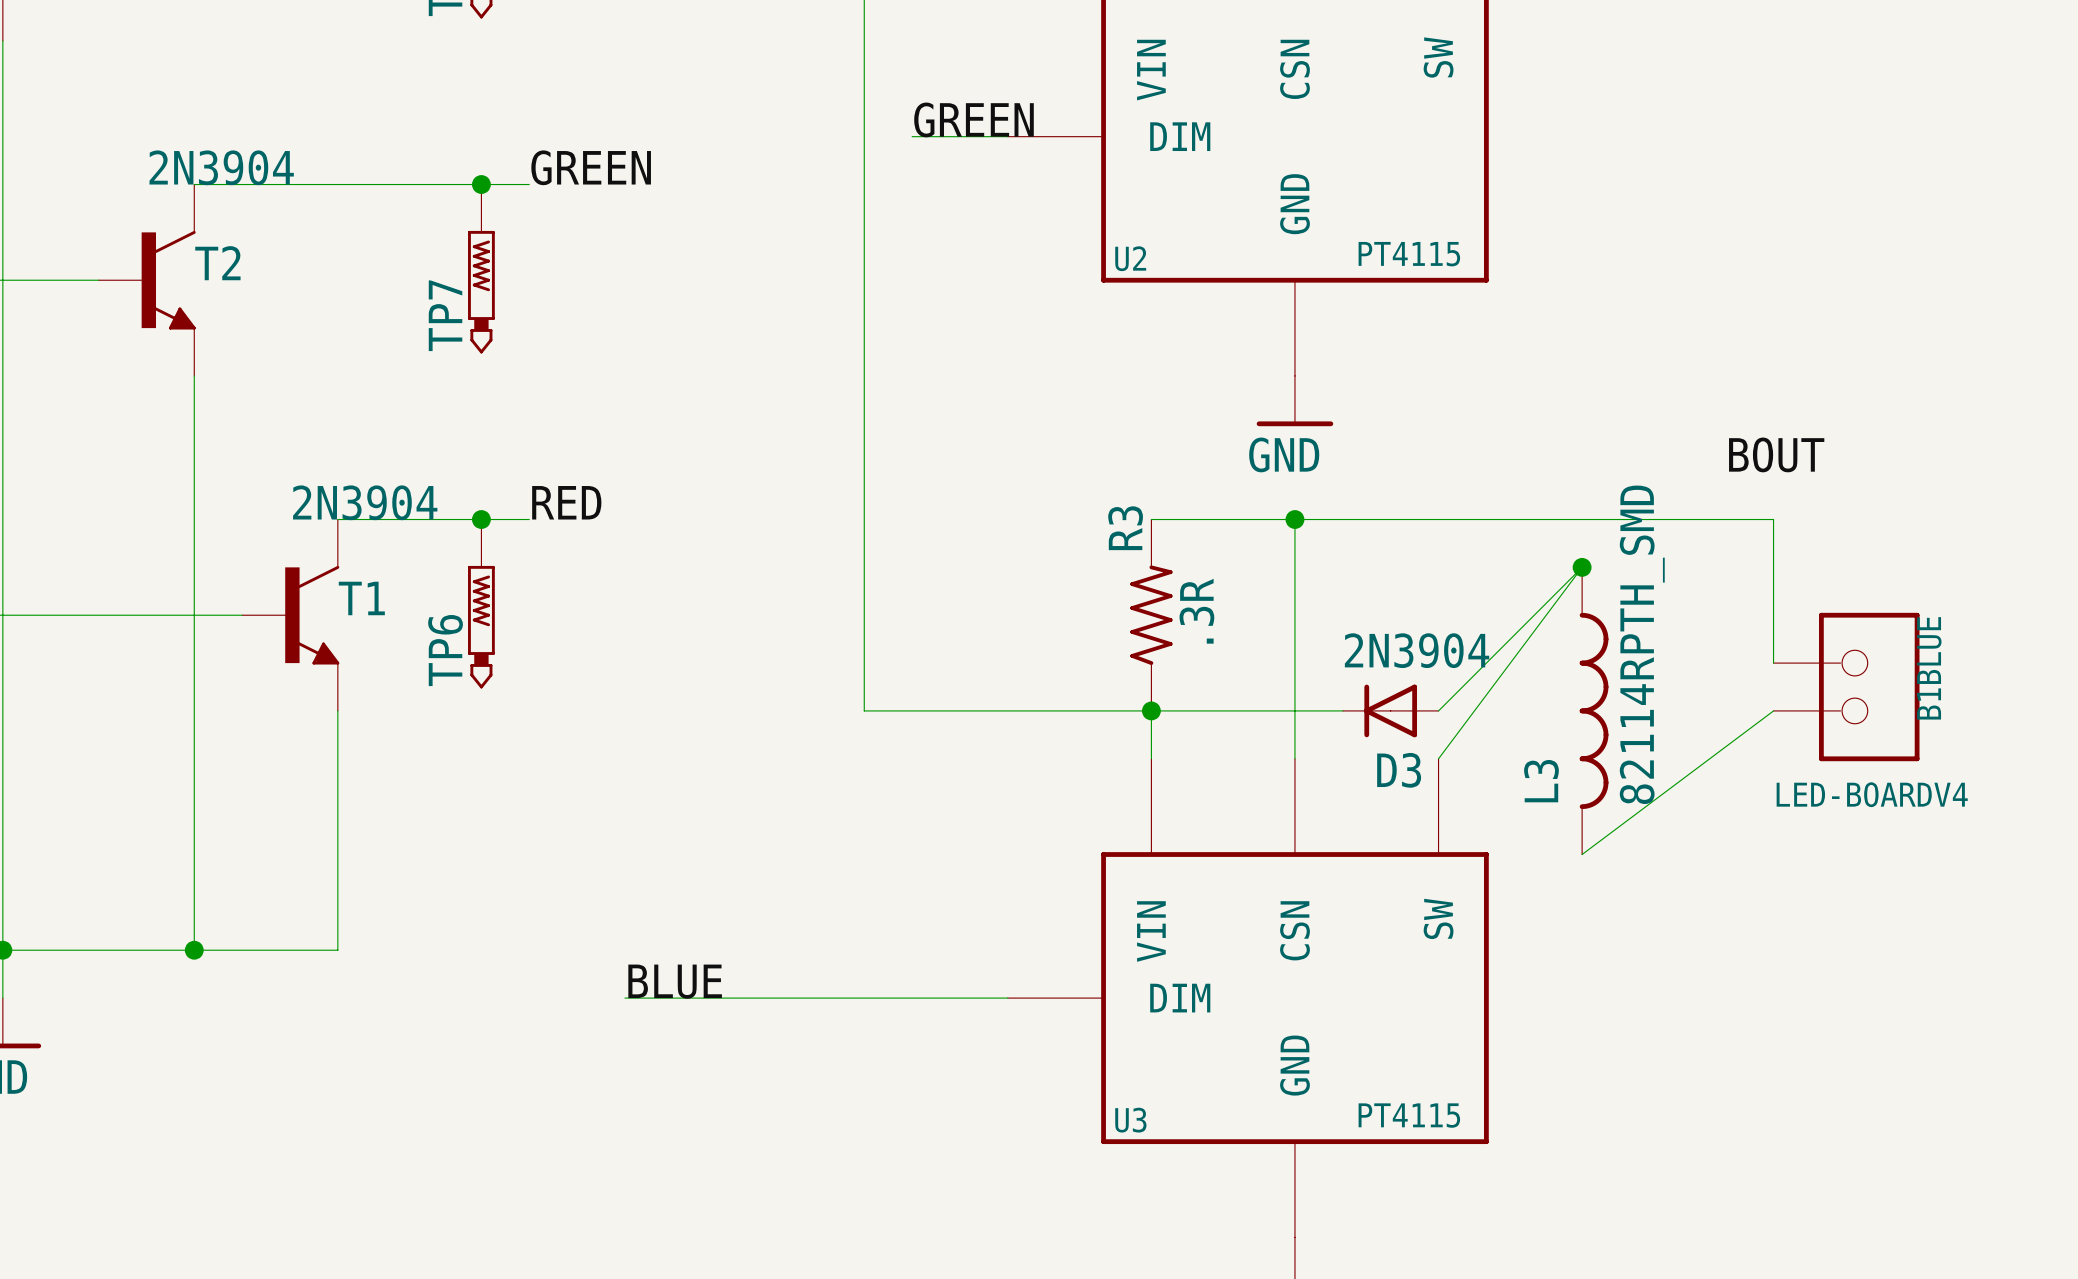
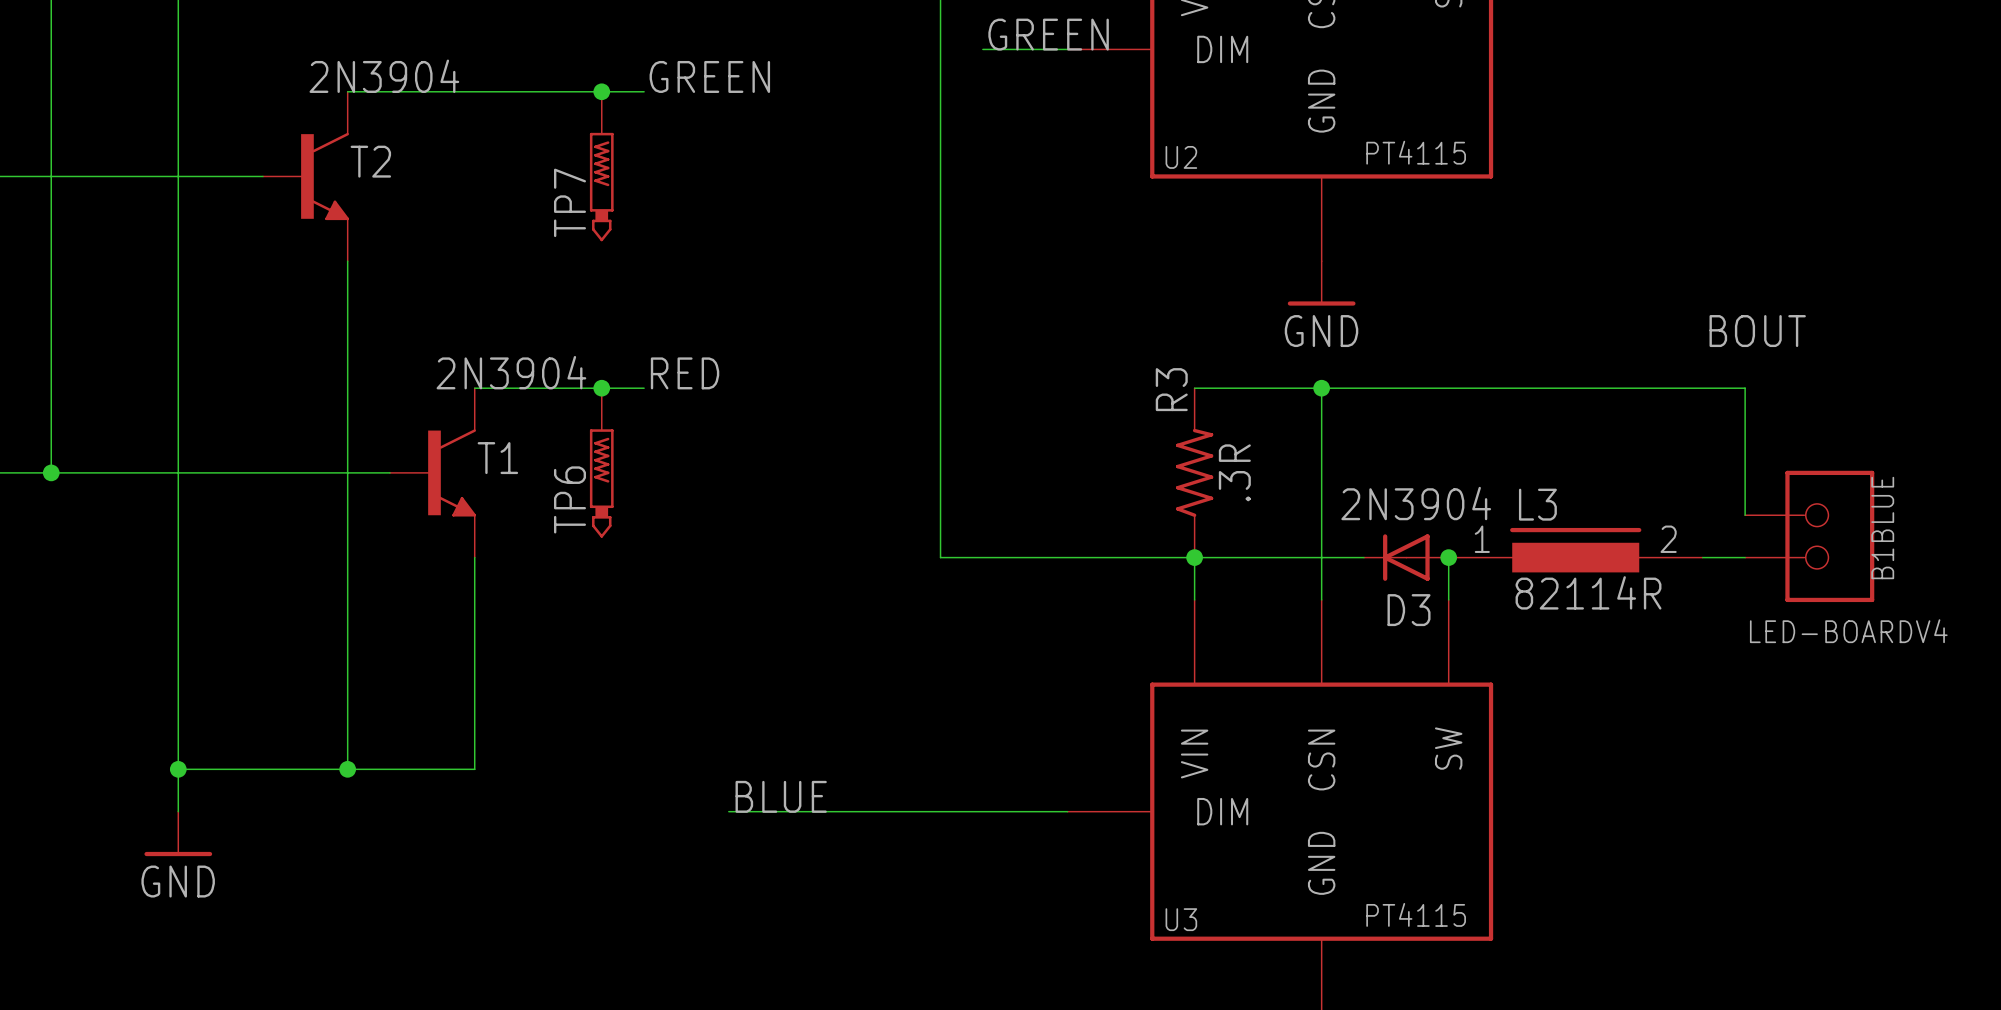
L3 symbol: [1579, 567, 1609, 855] -> [1448, 527, 1703, 573]
junction: (1582, 567) -> none
L3 value: 82114RPTH_SMD (1642, 644) -> 82114R (1588, 592)
wire: (1438, 710) (1582, 567) (1438, 758) -> (1448, 557) (1448, 599)
junction: none -> (1448, 557)
wire: (1773, 710) (1582, 854) -> (1745, 557) (1702, 557)
L3 name position: L3 (1541, 781) -> L3 (1537, 504)

